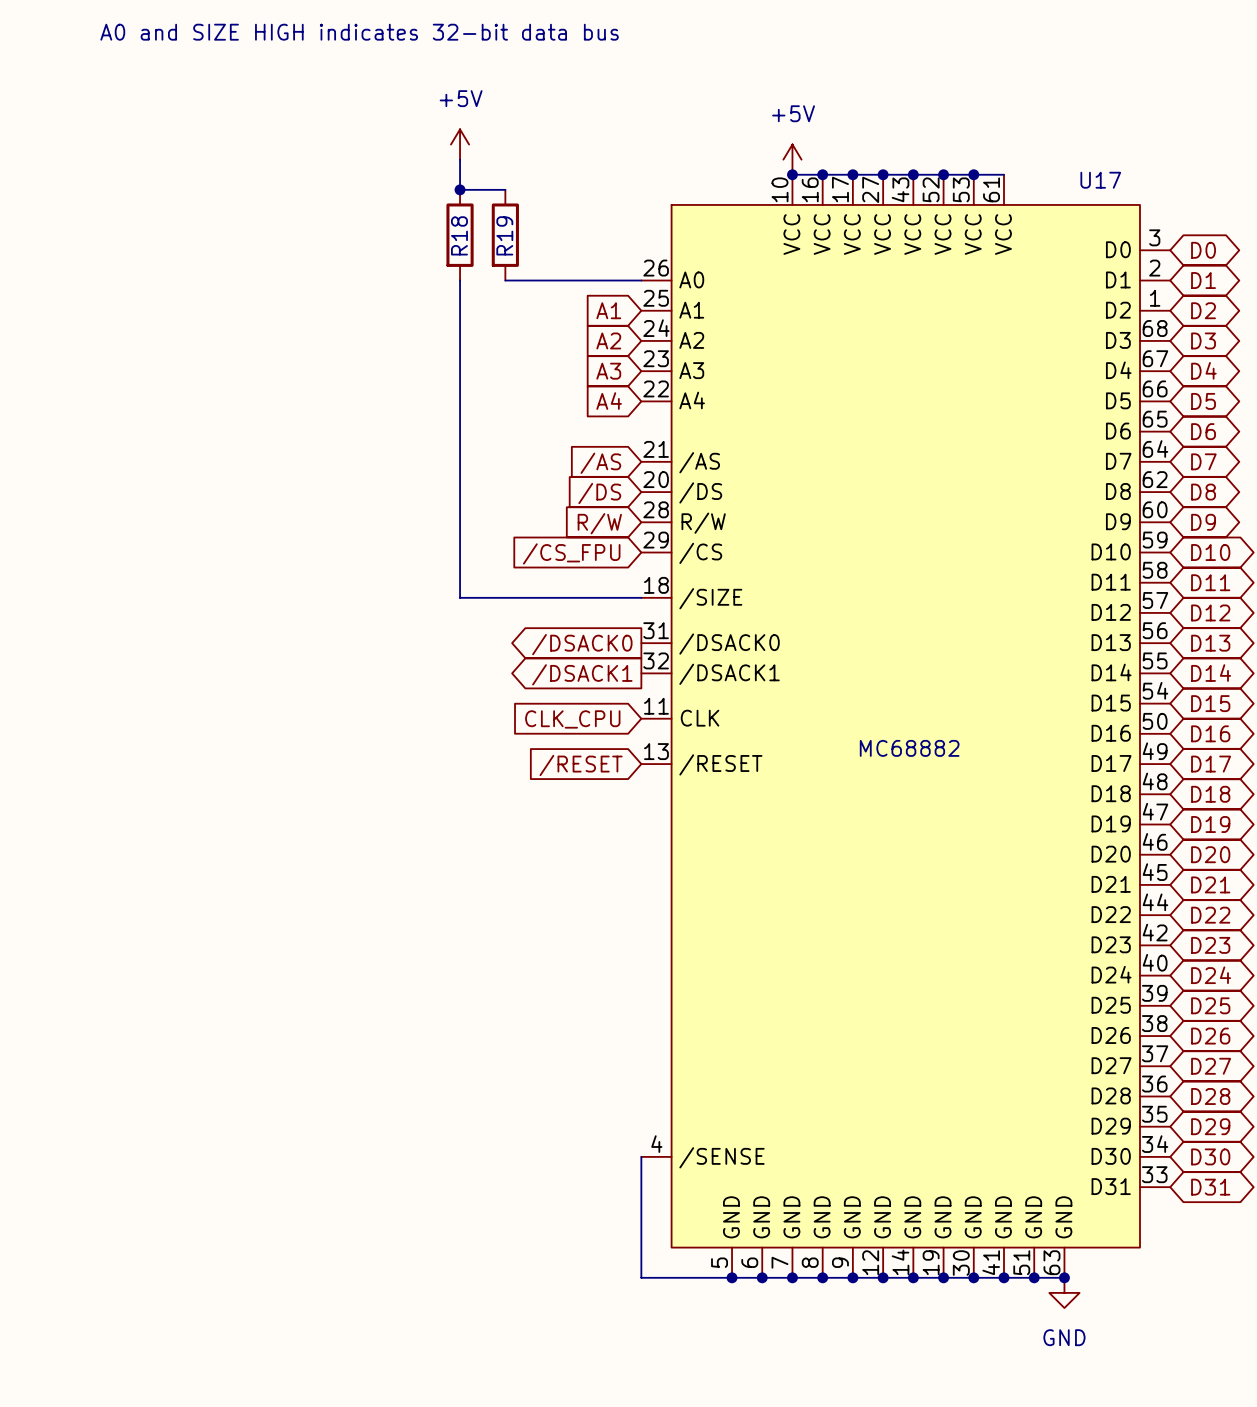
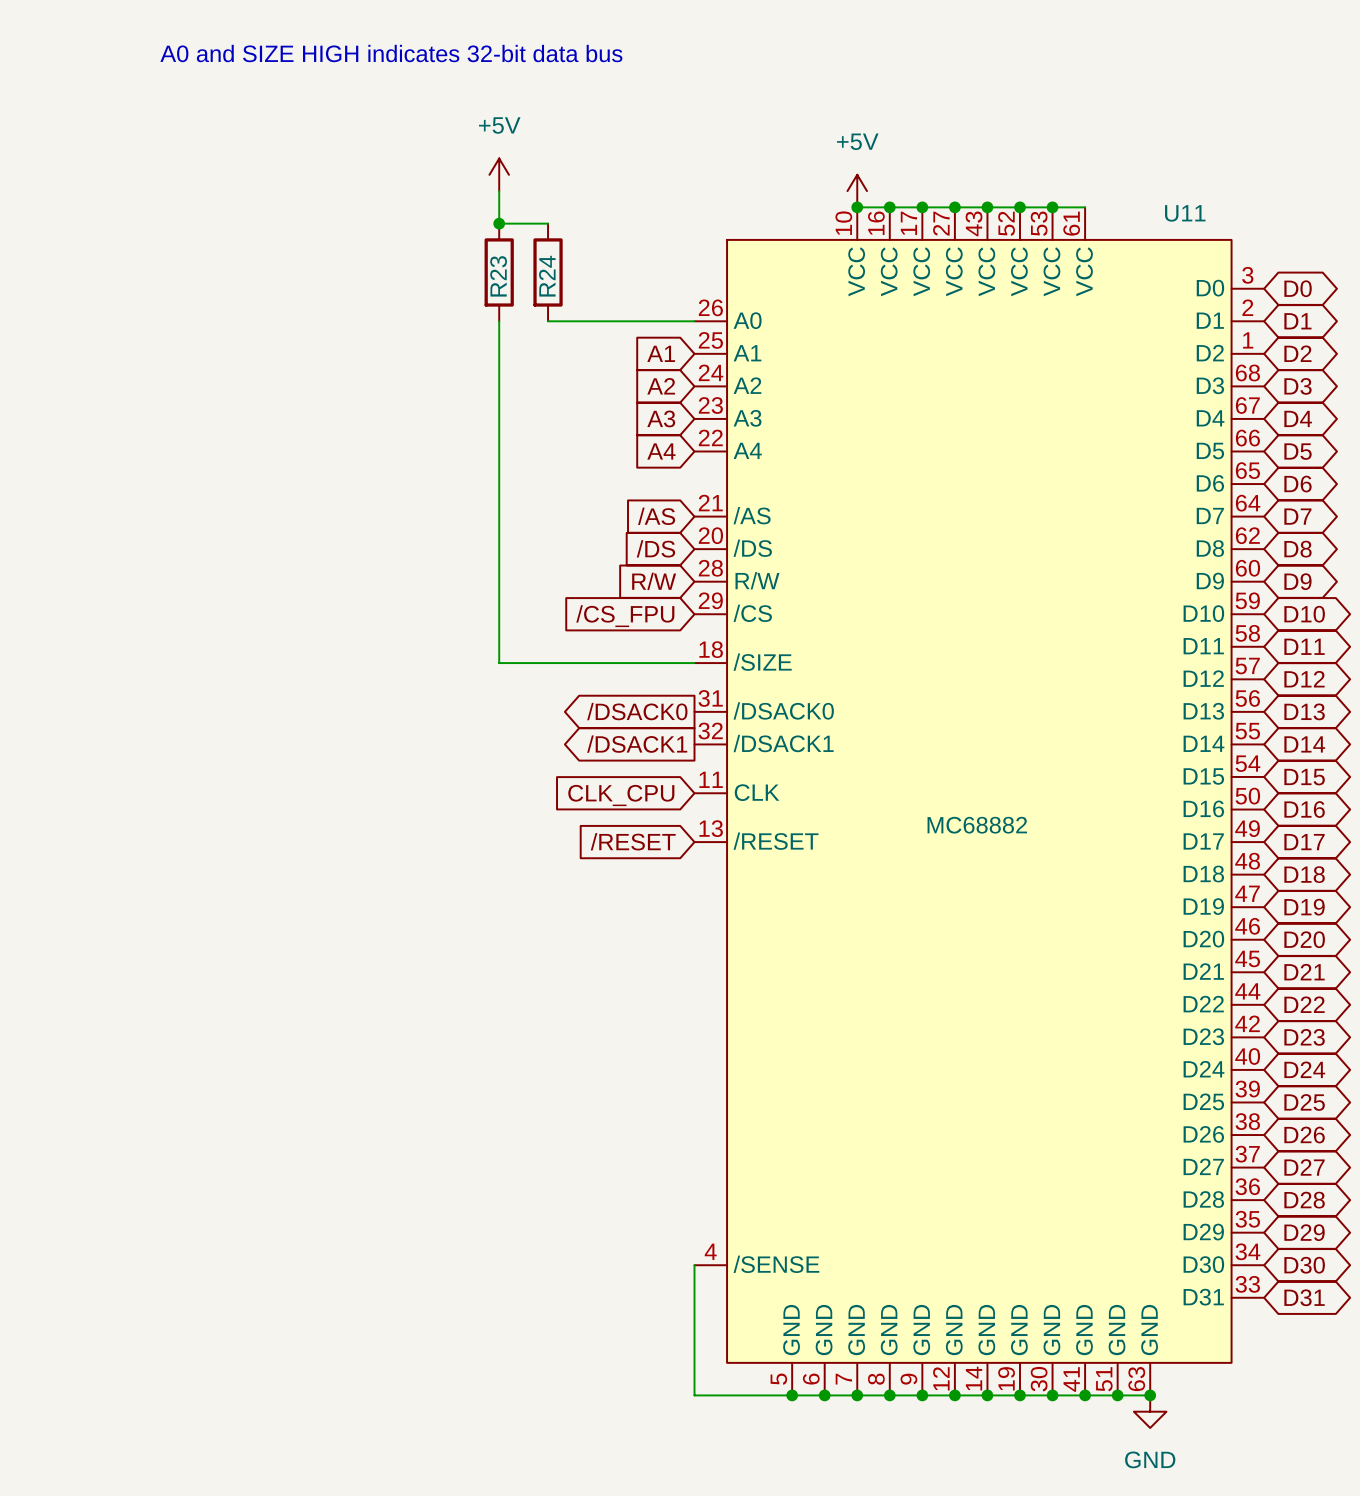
U17 name: U17 (1100, 180) -> U11 (1185, 213)
R18 name: R18 (459, 235) -> R23 (498, 276)
R19 name: R19 (504, 235) -> R24 (547, 276)

